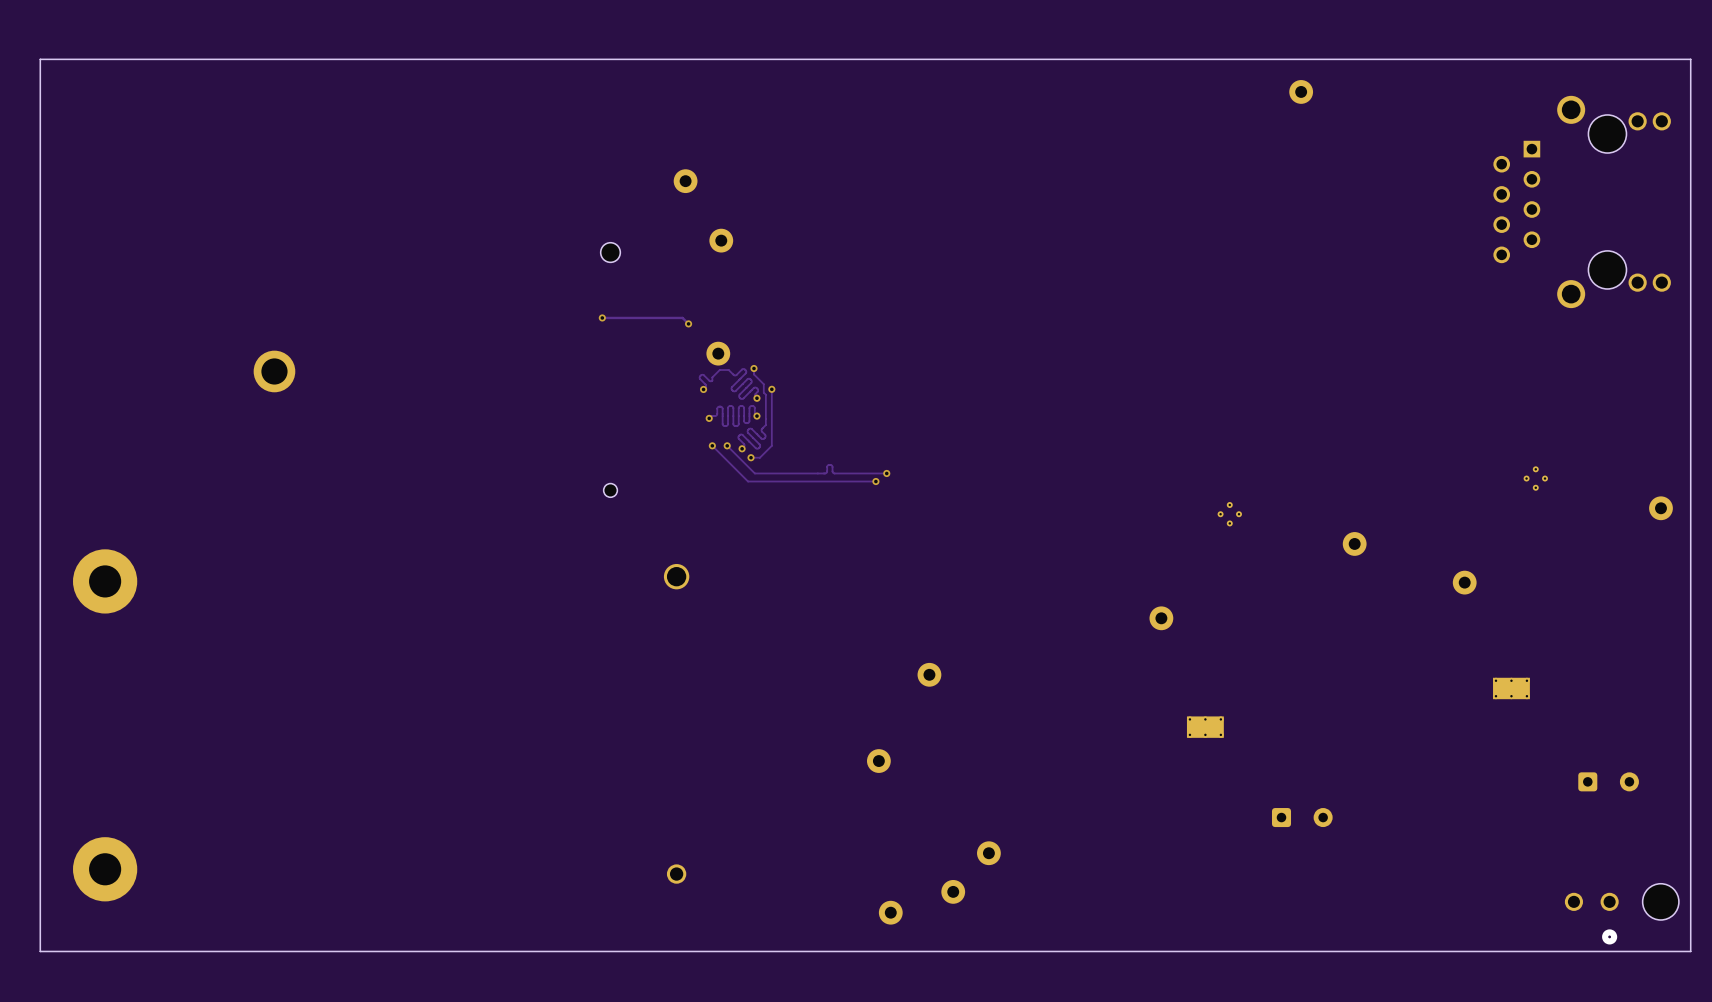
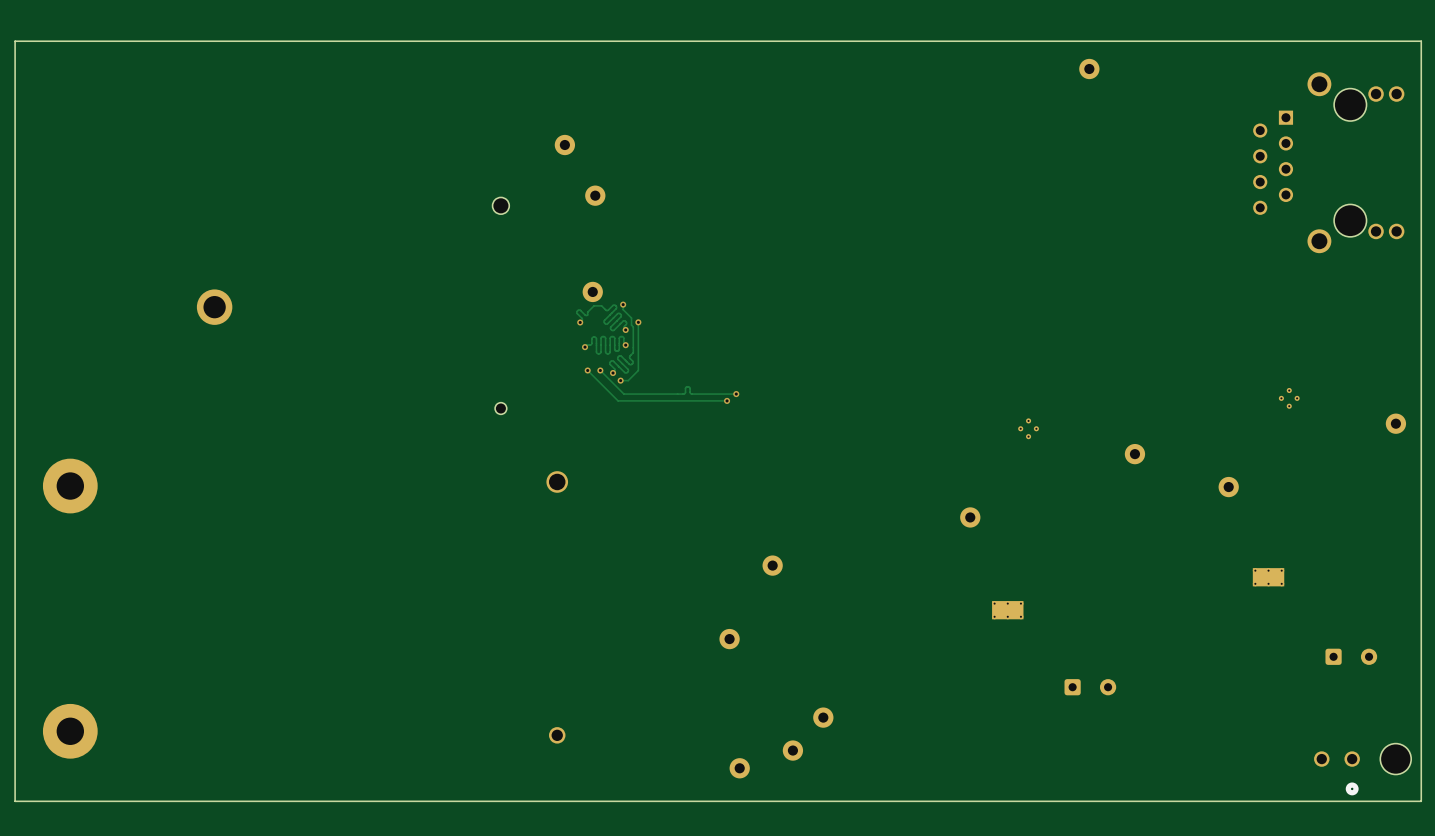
track: (602, 317) (682, 317) (688, 323) -> none
via: (602, 317) -> none
via: (688, 323) -> none

